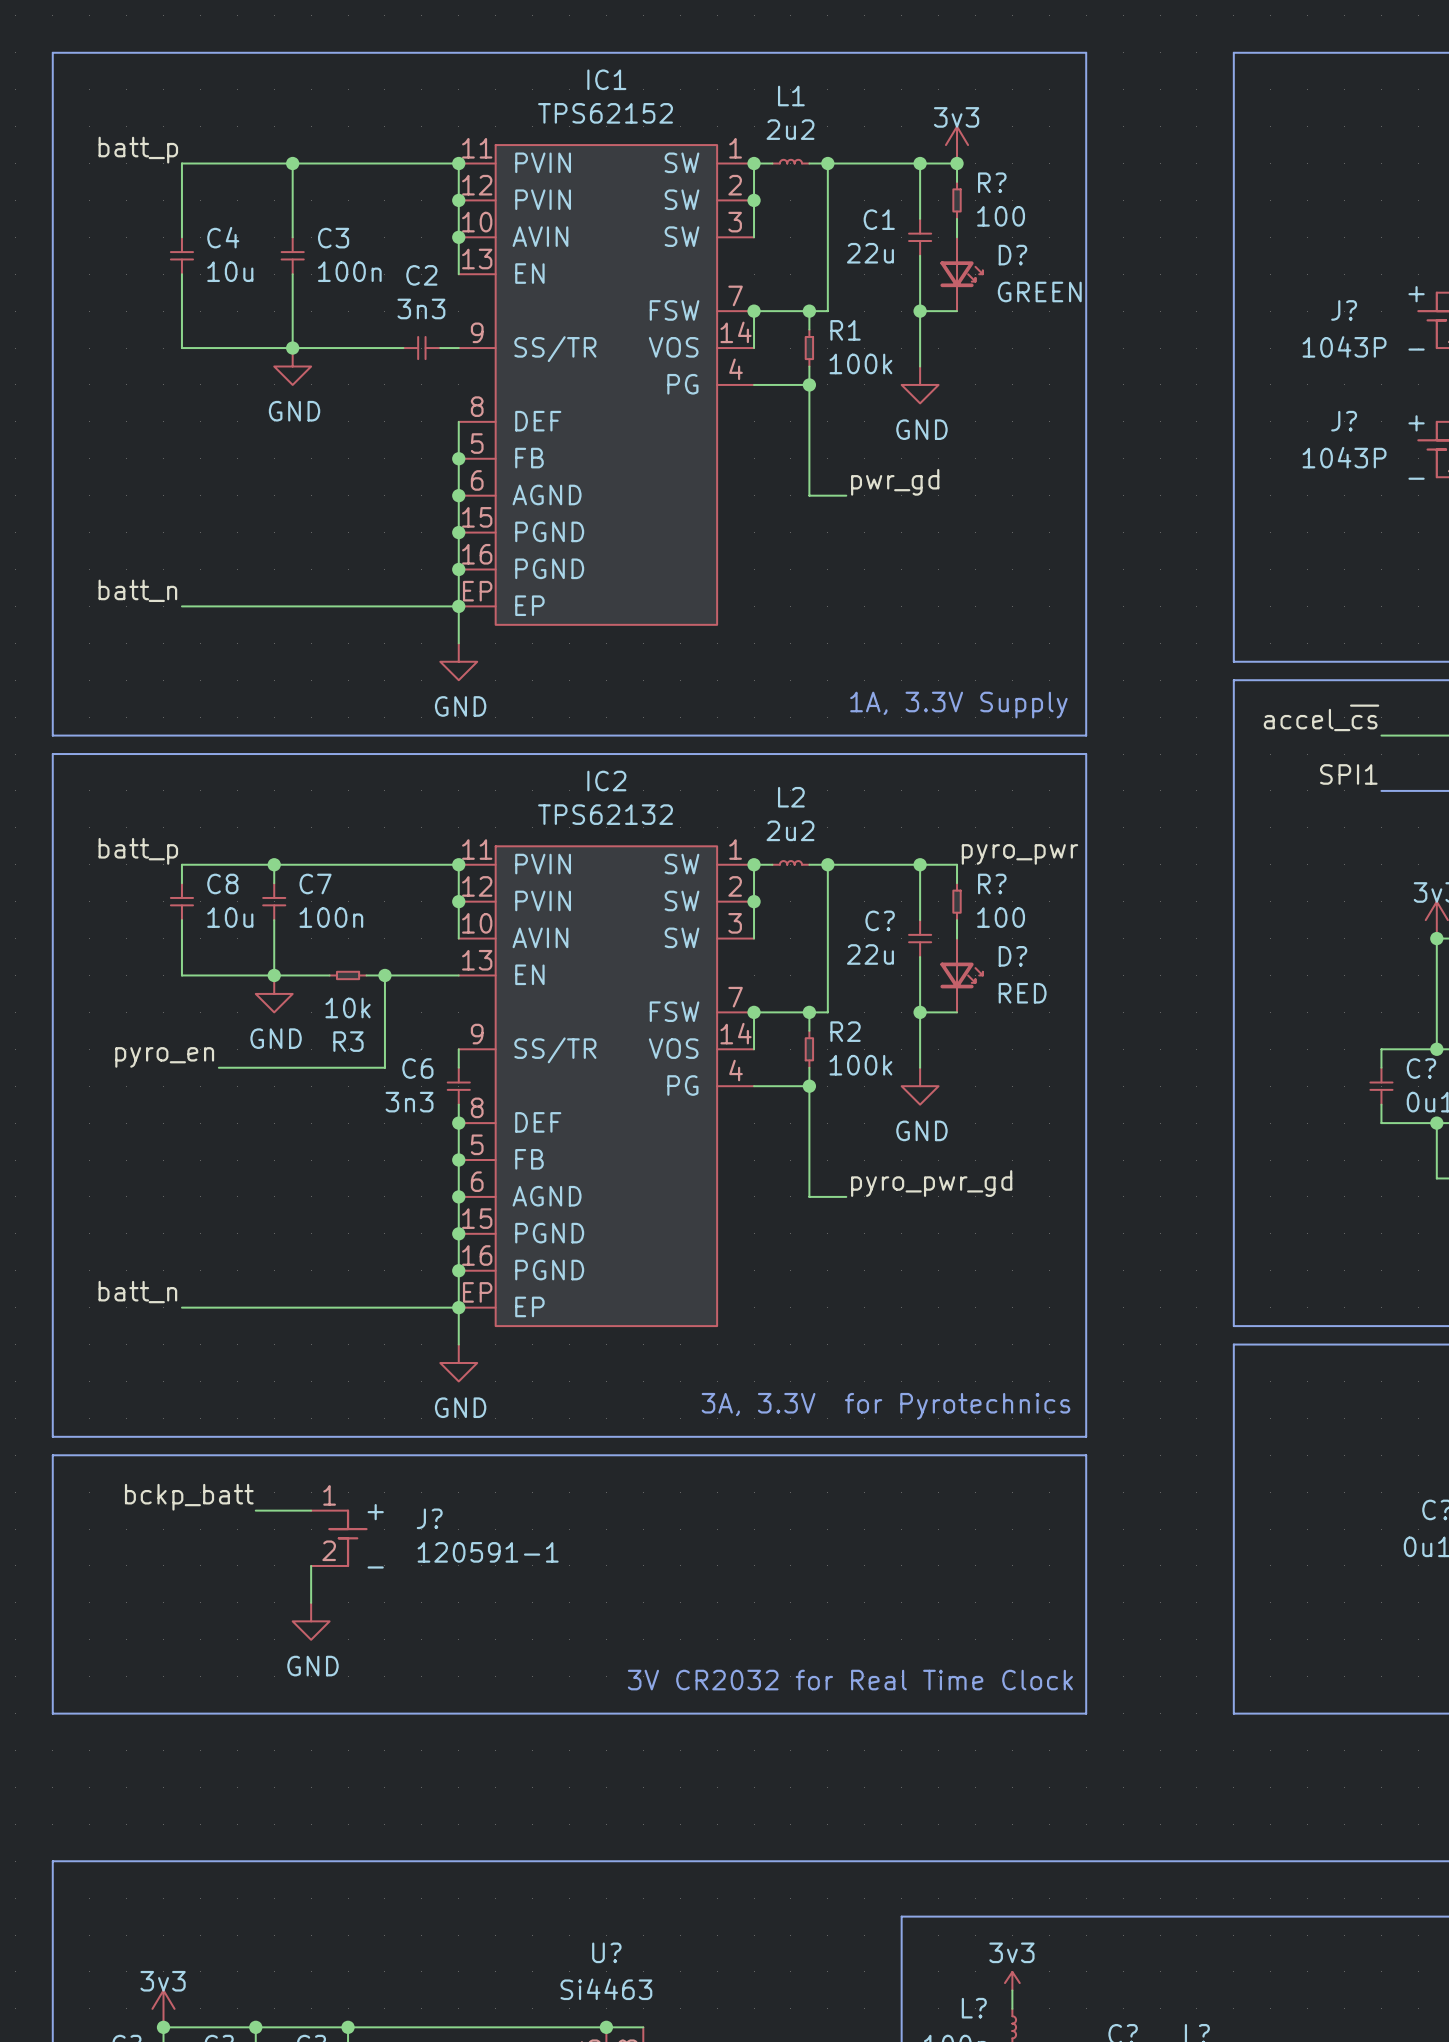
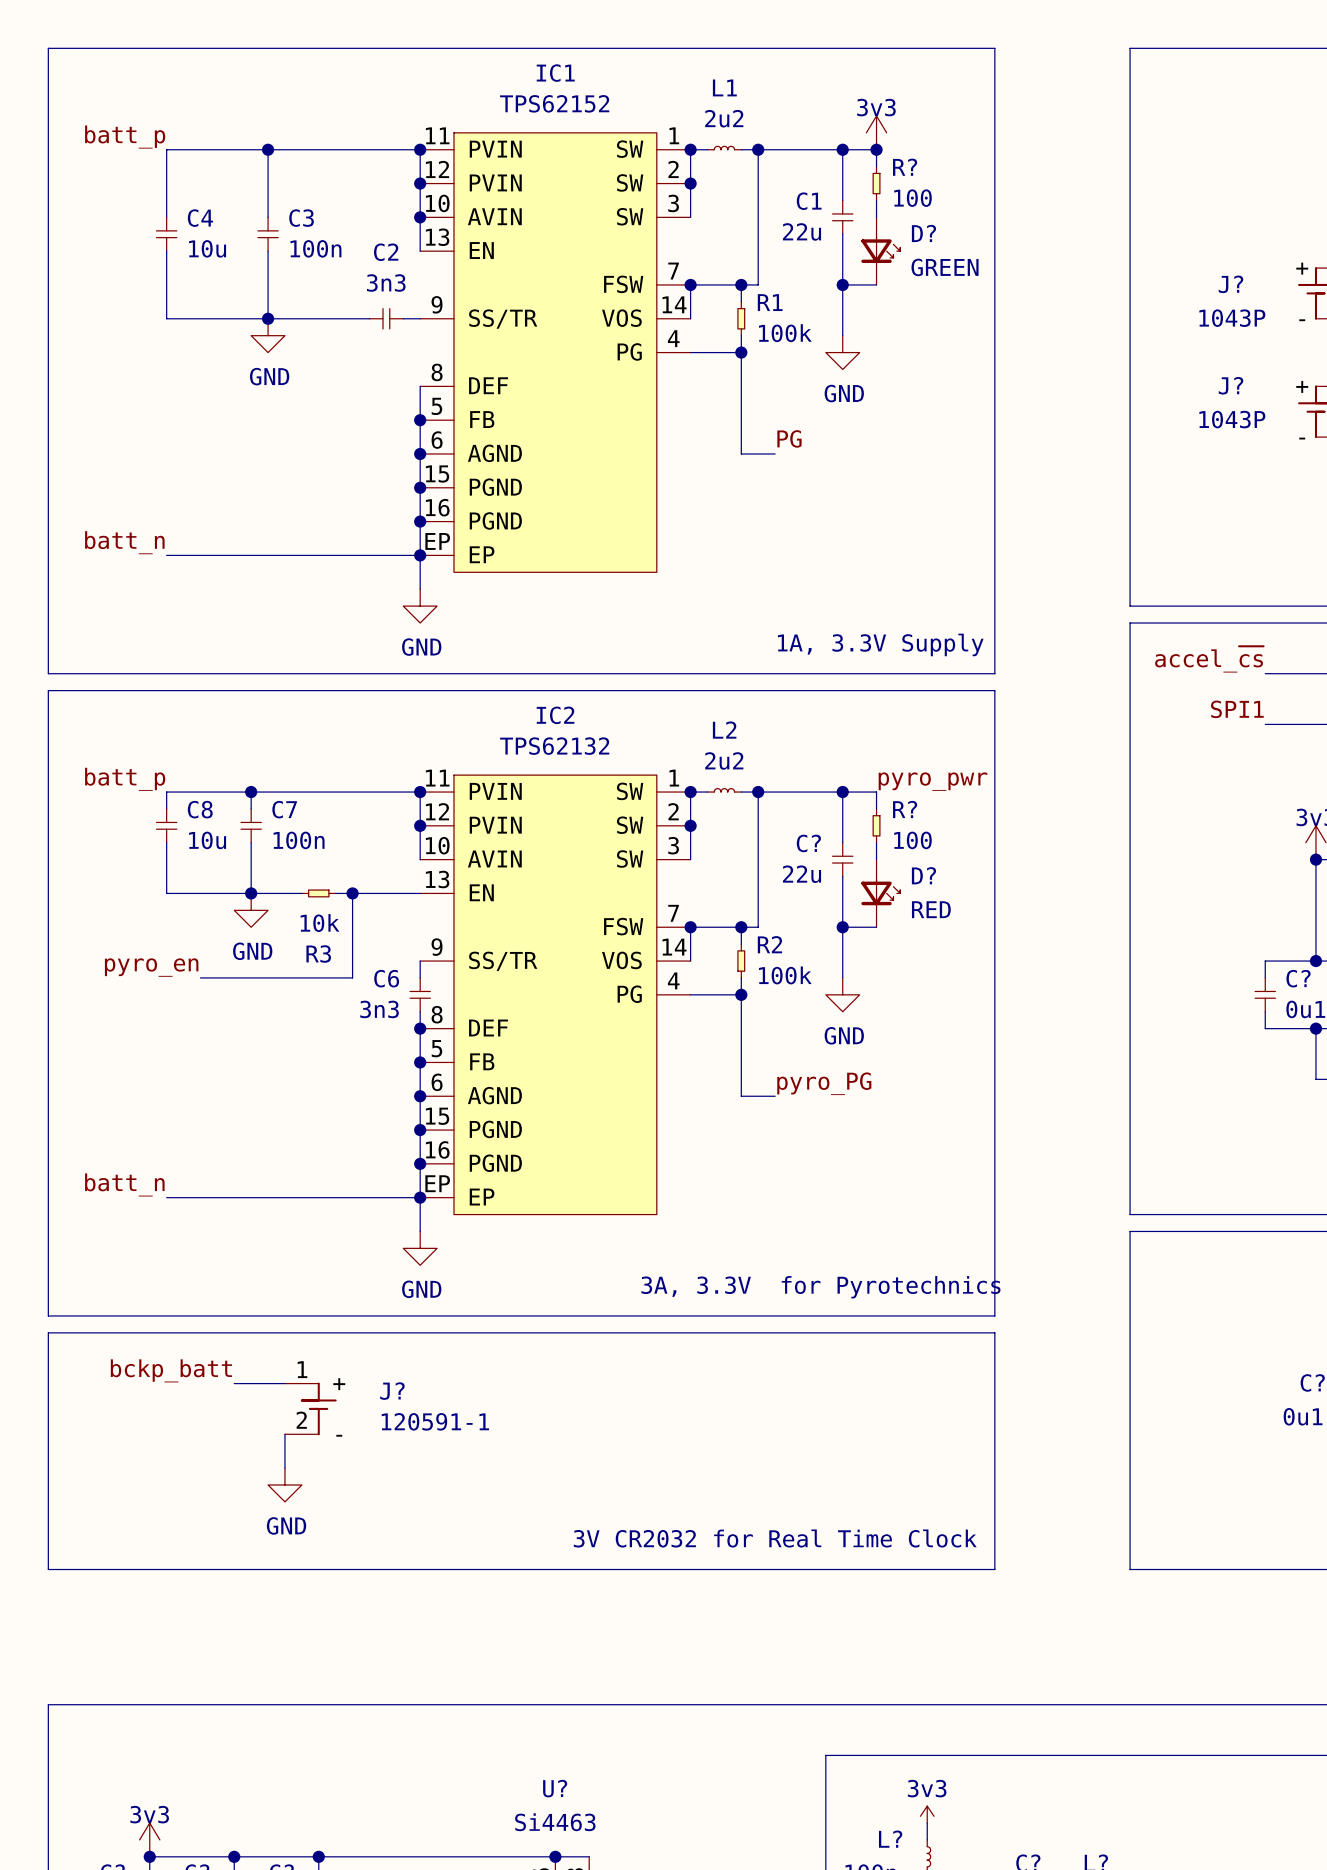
label: pwr_gd (895, 482) -> PG (789, 438)
label: pyro_pwr_gd (931, 1183) -> pyro_PG (824, 1083)

